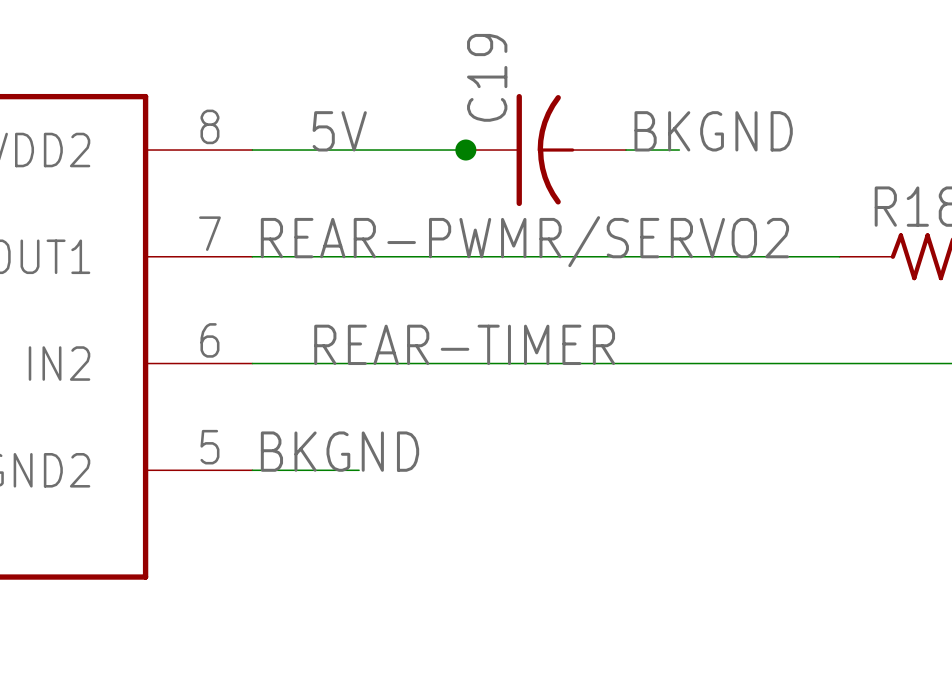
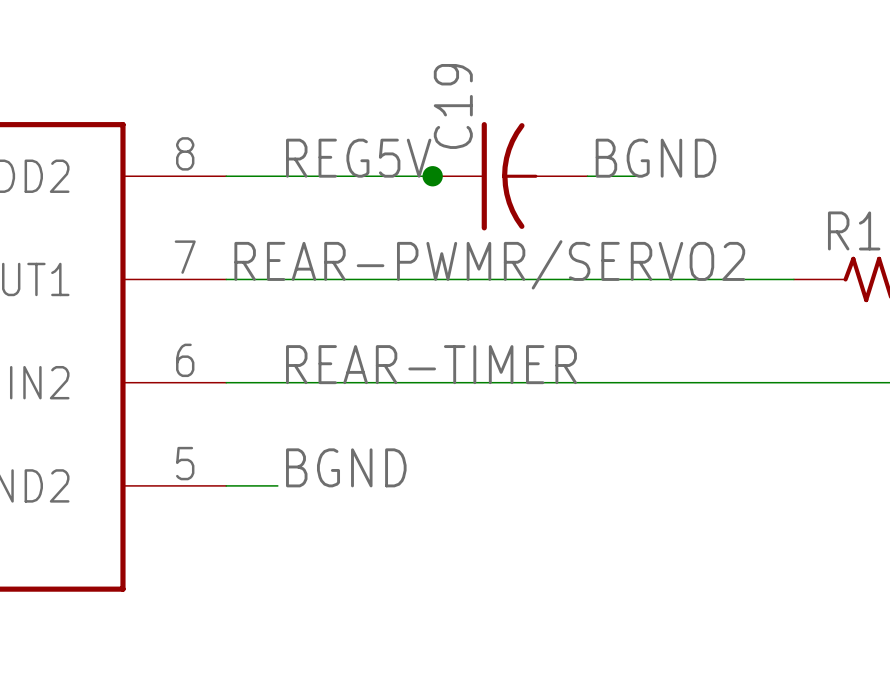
label: 5V (339, 131) -> REG5V (358, 158)
label: BKGND (713, 131) -> BGND (655, 158)
label: BKGND (339, 451) -> BGND (346, 467)
wire: (305, 470) (359, 470) -> none

